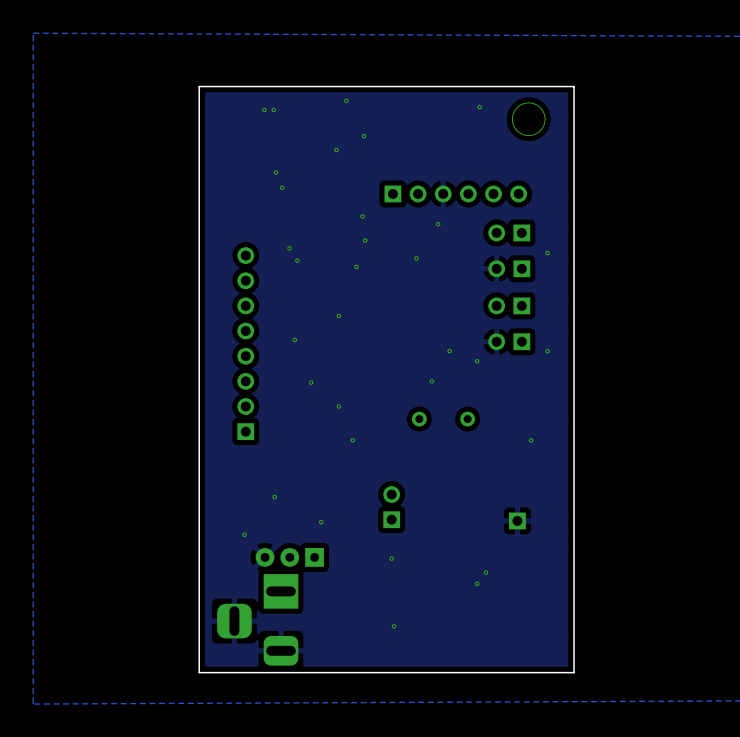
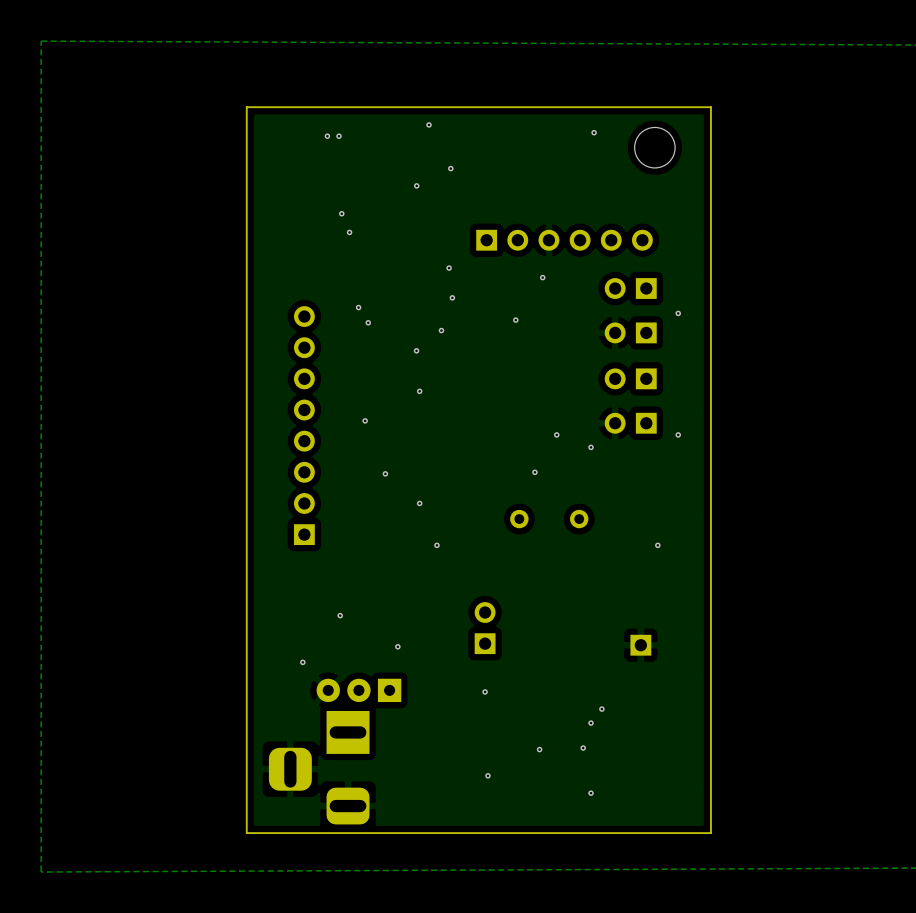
via: none -> (416, 350)
via: none -> (583, 748)
via: none -> (539, 749)
via: none -> (591, 793)

